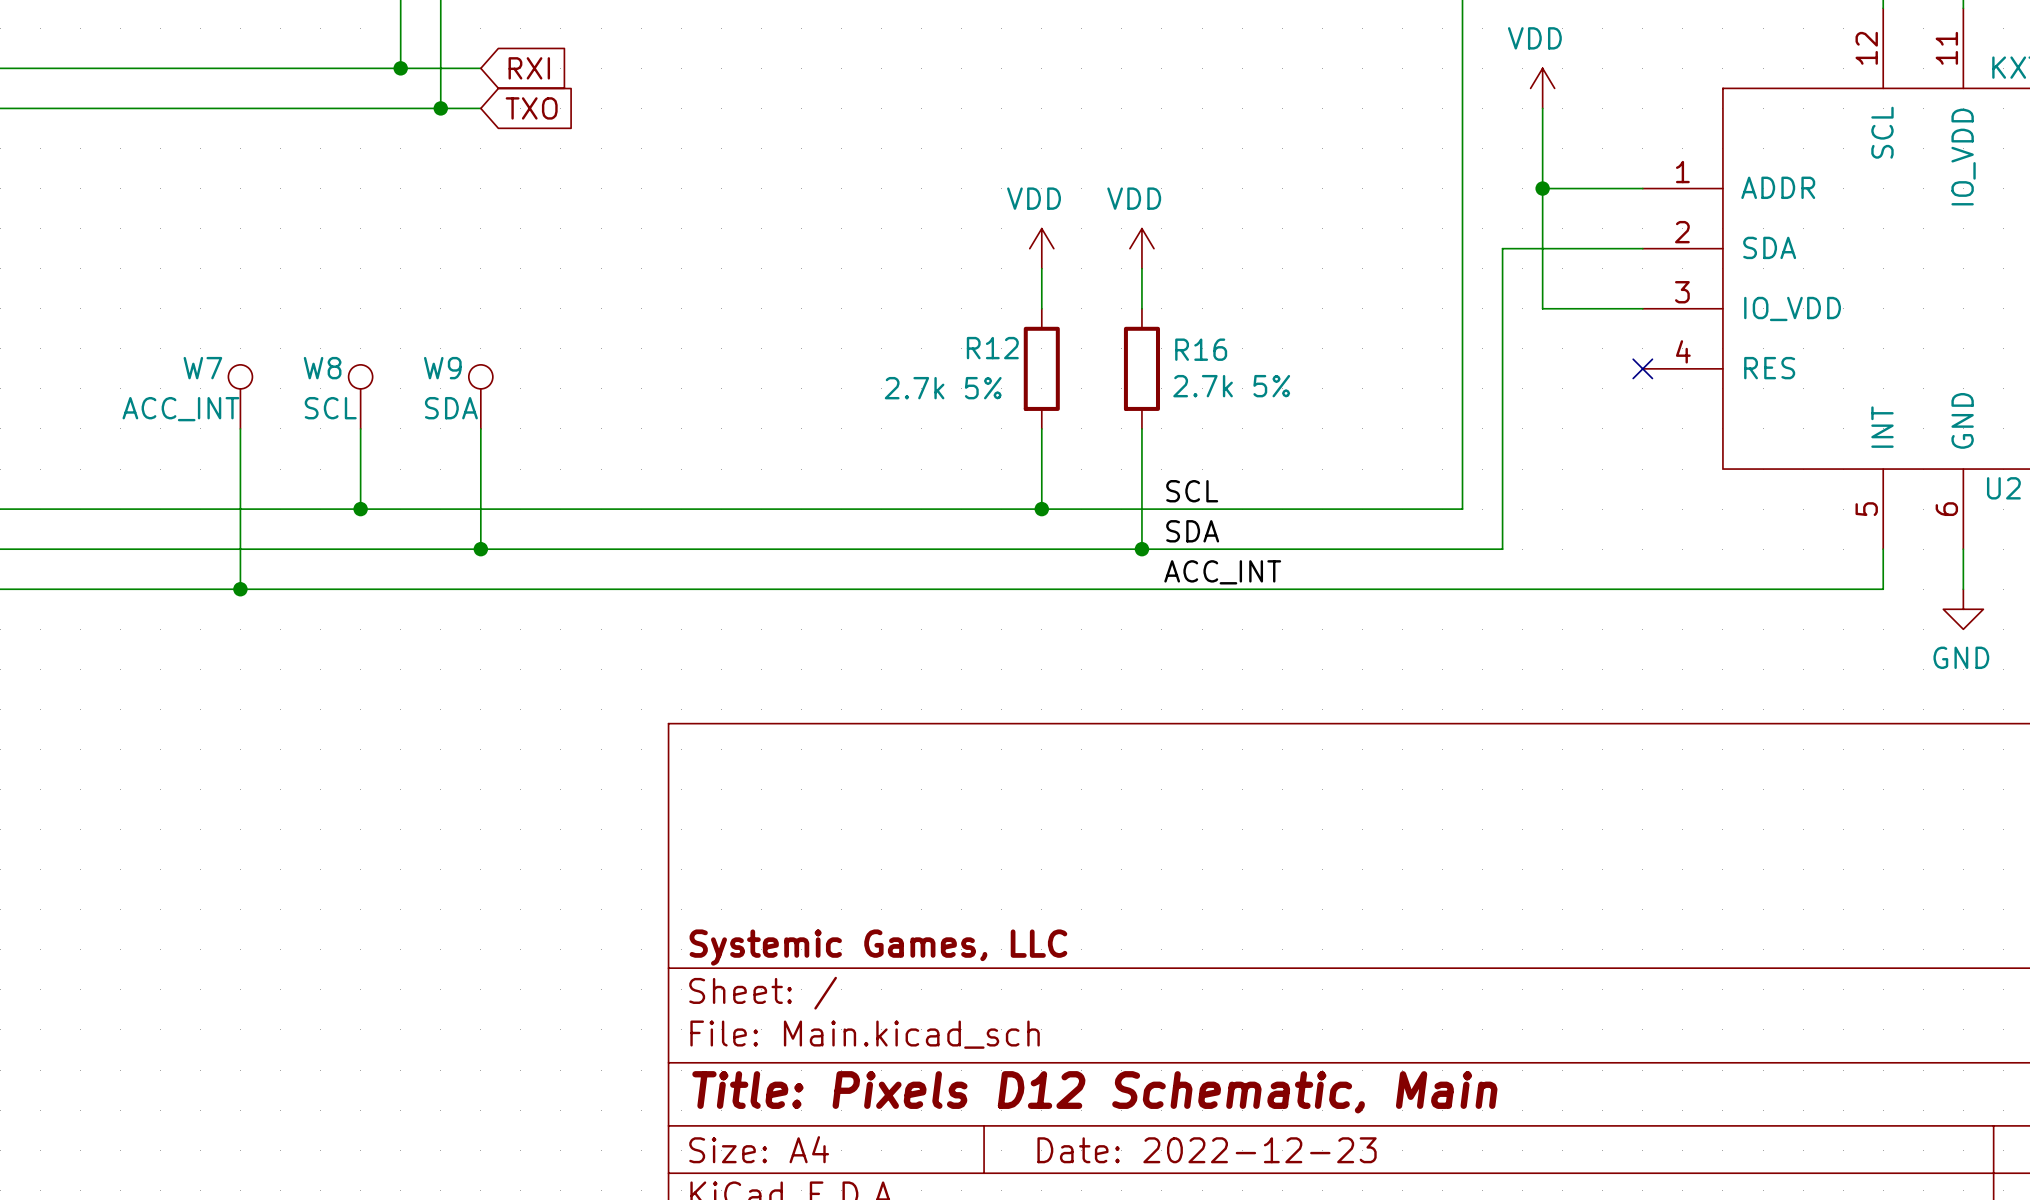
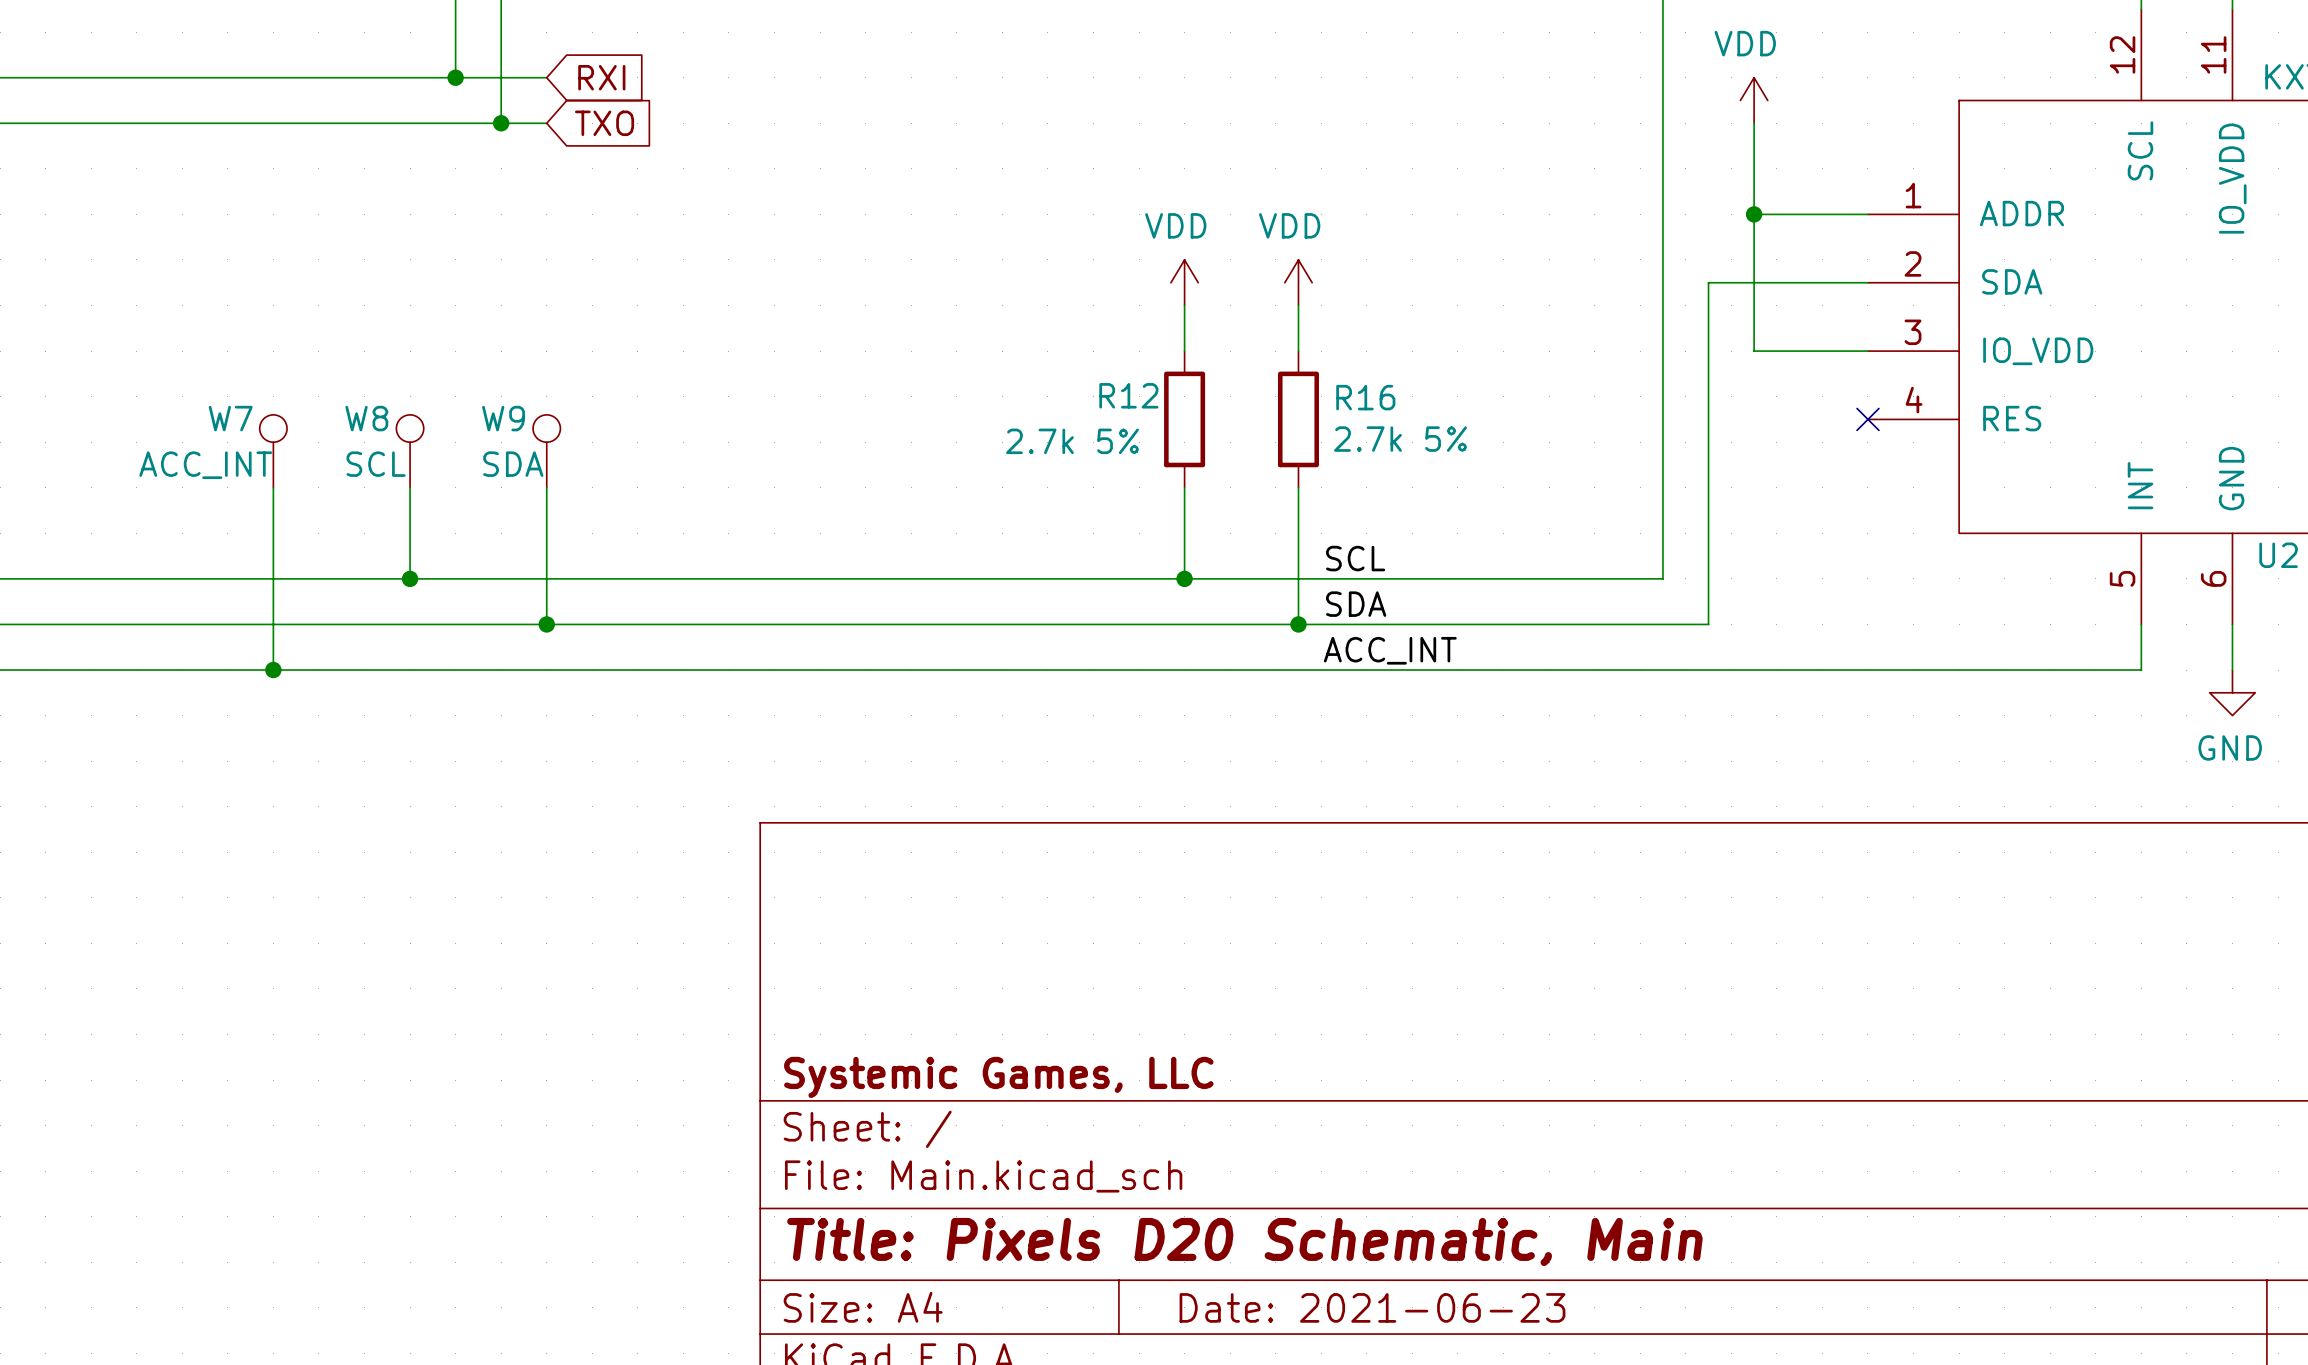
title block: Title: Pixels D12 Schematic, Main (1094, 1092) -> Title: Pixels D20 Schematic, Main (1244, 1241)
title block: Date: 2022-12-23 (1207, 1150) -> Date: 2021-06-23 (1372, 1307)

